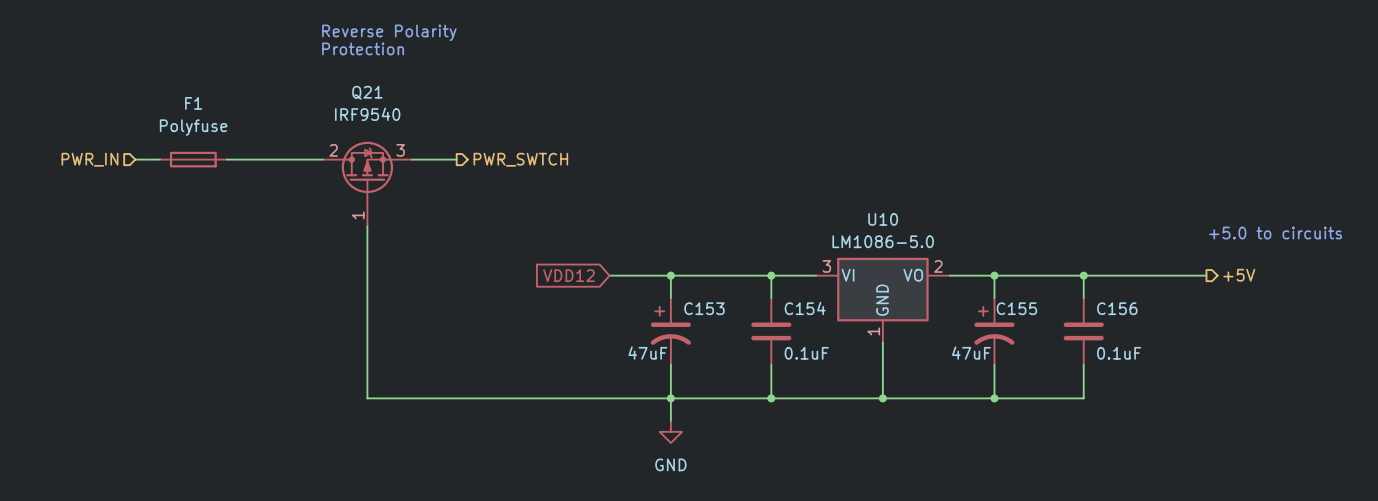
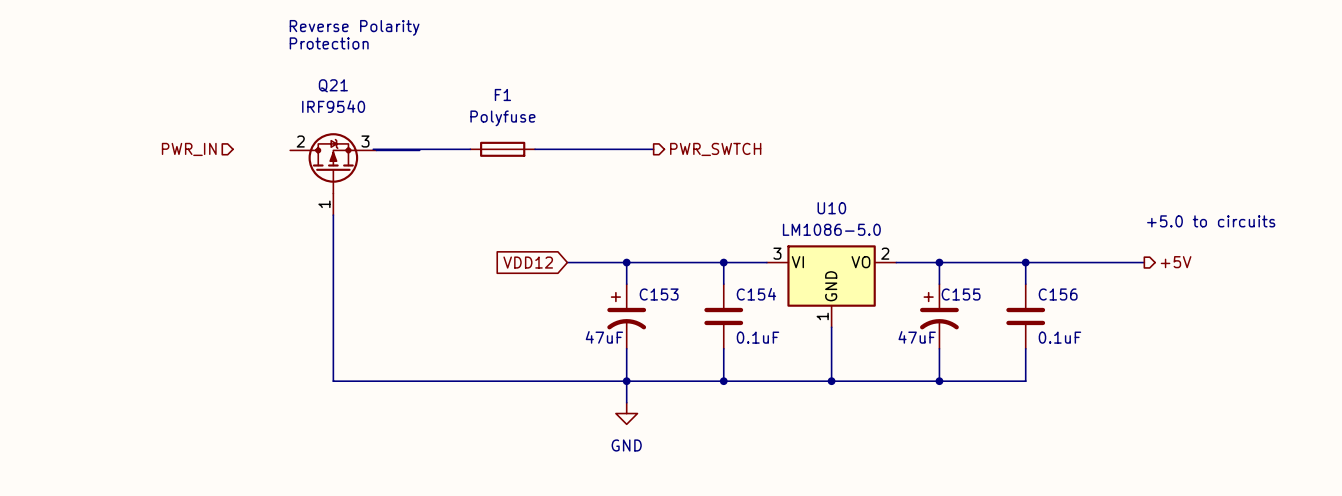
wire: none -> (373, 149) (470, 149)
wire: none -> (535, 149) (653, 149)
hierarchical label: none -> PWR_SWTCH (715, 149)
hierarchical label position: PWR_IN (89, 159) -> PWR_IN (189, 149)
wire: (135, 159) (159, 159) -> none
F1 position: (193, 159) -> (502, 149)
wire: (226, 159) (322, 159) -> none
hierarchical label: PWR_SWTCH (520, 159) -> none

